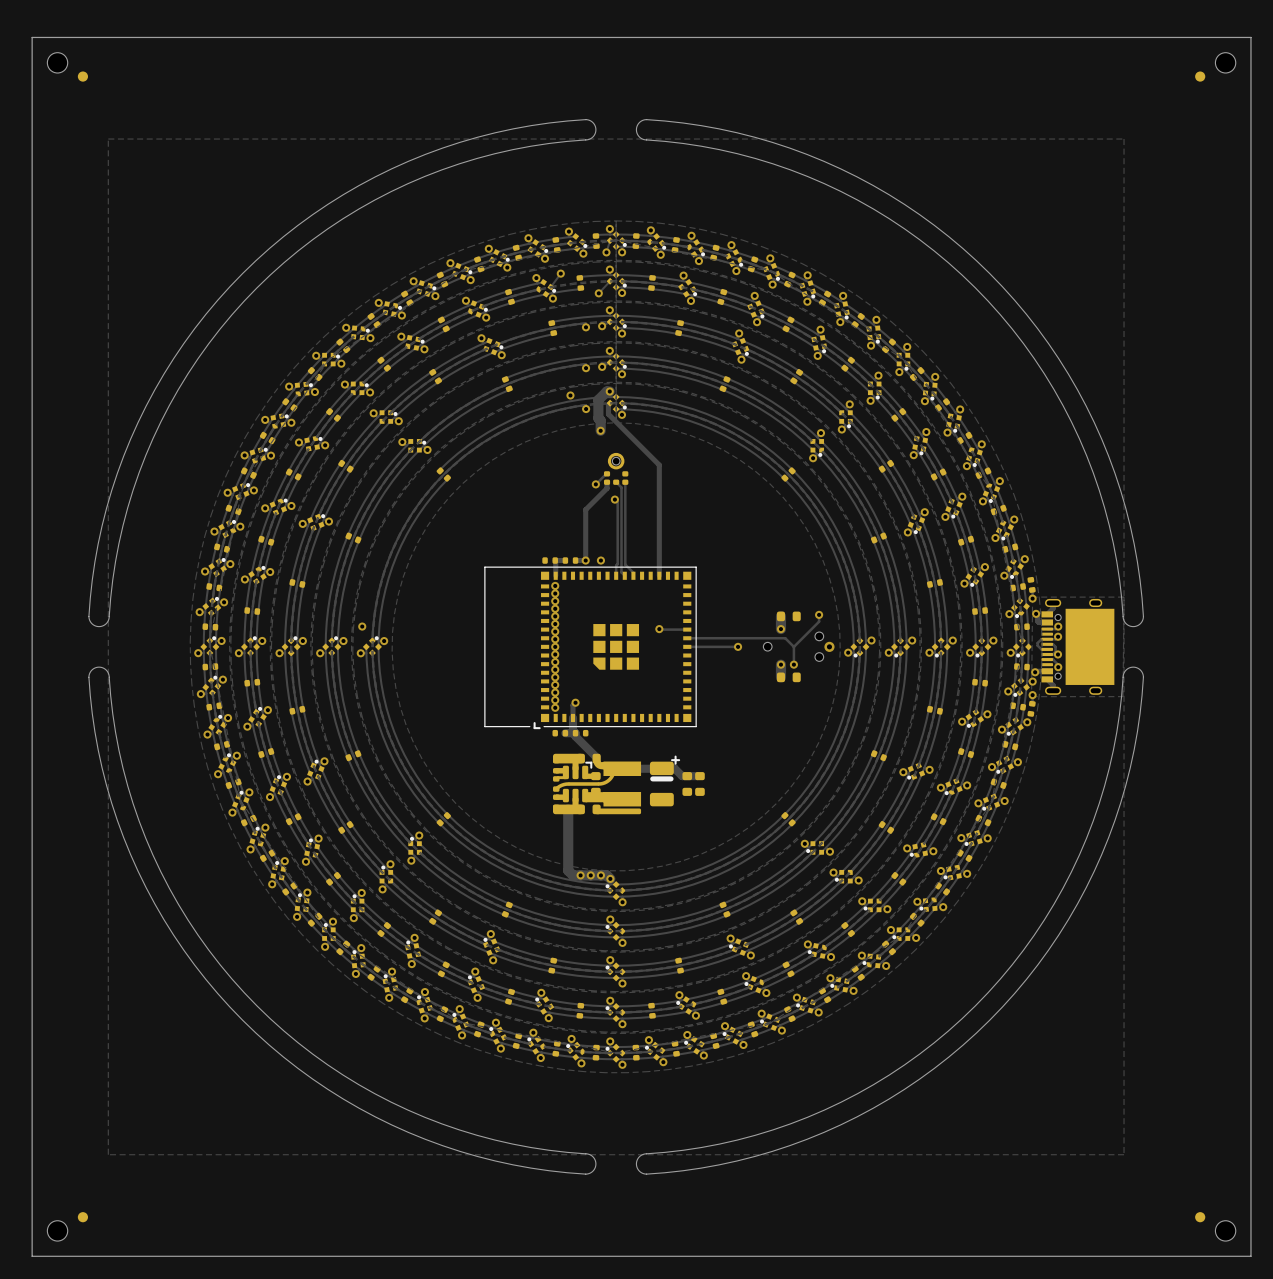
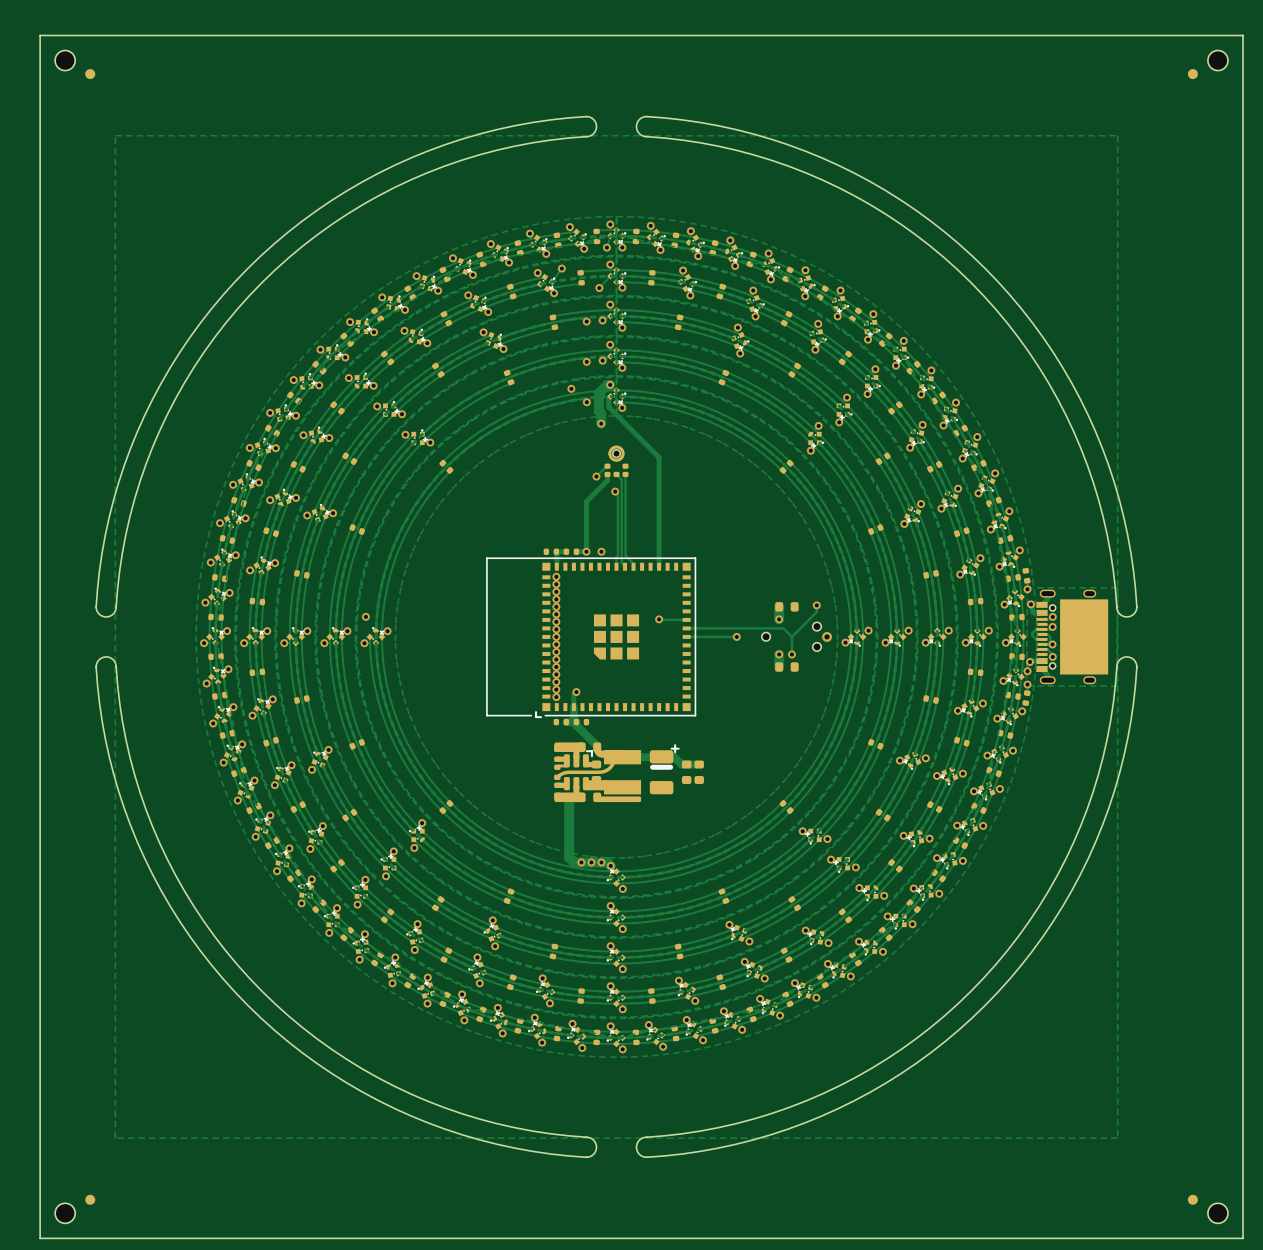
part footprint: [606, 231, 627, 250] -> [607, 226, 627, 246]
part footprint: [566, 233, 588, 252] -> [567, 228, 587, 248]
part footprint: [646, 233, 667, 252] -> [646, 228, 666, 248]
part footprint: [527, 239, 549, 258] -> [529, 234, 548, 253]
part footprint: [686, 239, 706, 258] -> [685, 234, 706, 253]
part footprint: [489, 249, 510, 268] -> [491, 244, 510, 263]
part footprint: [725, 249, 744, 268] -> [723, 244, 744, 263]
part footprint: [451, 262, 473, 281] -> [454, 257, 472, 276]
part footprint: [762, 262, 781, 281] -> [761, 257, 781, 277]
part footprint: [606, 271, 627, 291] -> [607, 266, 627, 286]
part footprint: [535, 279, 557, 298] -> [537, 273, 556, 293]
part footprint: [678, 279, 698, 298] -> [677, 273, 698, 293]
part footprint: [416, 280, 437, 297] -> [419, 275, 437, 292]
part footprint: [799, 280, 817, 299] -> [797, 275, 816, 294]
part footprint: [467, 300, 488, 318] -> [469, 294, 488, 313]
part footprint: [747, 300, 765, 319] -> [745, 294, 765, 314]
part footprint: [382, 301, 403, 317] -> [385, 295, 404, 312]
part footprint: [833, 301, 850, 320] -> [831, 295, 850, 314]
part footprint: [606, 312, 627, 332] -> [607, 306, 627, 326]
part footprint: [351, 325, 370, 341] -> [354, 318, 372, 335]
part footprint: [866, 325, 882, 344] -> [863, 319, 881, 337]
part footprint: [405, 334, 425, 351] -> [408, 328, 426, 345]
part footprint: [811, 334, 828, 354] -> [809, 329, 827, 347]
part footprint: [483, 337, 504, 356] -> [485, 331, 503, 350]
part footprint: [731, 337, 750, 356] -> [730, 331, 750, 351]
part footprint: [322, 352, 341, 367] -> [326, 344, 343, 361]
part footprint: [896, 352, 911, 371] -> [893, 346, 910, 364]
part footprint: [606, 353, 627, 372] -> [607, 347, 627, 366]
part footprint: [294, 381, 313, 397] -> [299, 372, 317, 390]
part footprint: [350, 381, 369, 396] -> [354, 372, 372, 389]
part footprint: [867, 381, 882, 400] -> [864, 375, 881, 392]
part footprint: [922, 381, 938, 401] -> [919, 375, 936, 393]
part footprint: [606, 393, 627, 413] -> [607, 387, 627, 406]
part footprint: [379, 410, 398, 424] -> [383, 400, 400, 417]
part footprint: [839, 410, 853, 429] -> [836, 403, 853, 420]
part footprint: [270, 413, 289, 430] -> [275, 404, 294, 423]
part footprint: [946, 413, 962, 433] -> [942, 406, 959, 424]
part footprint: [304, 435, 323, 452] -> [308, 426, 327, 445]
part footprint: [912, 435, 929, 456] -> [908, 428, 925, 446]
part footprint: [408, 439, 427, 453] -> [411, 429, 428, 446]
part footprint: [810, 439, 825, 457] -> [808, 431, 825, 449]
part footprint: [249, 447, 268, 464] -> [254, 437, 273, 457]
part footprint: [966, 447, 983, 468] -> [961, 439, 979, 457]
part footprint: [232, 482, 251, 501] -> [237, 473, 256, 493]
part footprint: [982, 482, 1001, 504] -> [978, 474, 996, 493]
part footprint: [269, 498, 288, 516] -> [274, 488, 293, 508]
part footprint: [945, 498, 963, 519] -> [941, 490, 959, 508]
part footprint: [307, 513, 326, 532] -> [311, 503, 330, 523]
part footprint: [907, 513, 926, 535] -> [904, 505, 922, 523]
part footprint: [218, 519, 237, 538] -> [223, 510, 243, 530]
part footprint: [995, 519, 1014, 541] -> [991, 511, 1010, 530]
part footprint: [208, 557, 227, 577] -> [214, 548, 233, 568]
part footprint: [1005, 558, 1024, 579] -> [1000, 549, 1019, 568]
part footprint: [248, 565, 267, 585] -> [253, 556, 272, 576]
part footprint: [965, 566, 985, 587] -> [961, 557, 980, 576]
part footprint: [202, 596, 222, 617] -> [208, 587, 227, 607]
part footprint: [1011, 597, 1030, 619] -> [1006, 588, 1025, 608]
part footprint: [200, 636, 220, 657] -> [206, 627, 225, 647]
part footprint: [241, 636, 260, 657] -> [246, 627, 265, 647]
part footprint: [281, 636, 301, 657] -> [286, 627, 305, 647]
part footprint: [322, 636, 342, 657] -> [326, 627, 346, 647]
part footprint: [363, 636, 382, 657] -> [366, 627, 386, 647]
part footprint: [850, 637, 870, 658] -> [847, 627, 867, 647]
part footprint: [891, 637, 910, 658] -> [887, 627, 907, 647]
part footprint: [931, 637, 951, 658] -> [928, 627, 947, 647]
part footprint: [972, 637, 992, 658] -> [968, 627, 987, 647]
part footprint: [1013, 637, 1032, 658] -> [1008, 627, 1027, 647]
part footprint: [202, 675, 222, 697] -> [208, 666, 227, 686]
part footprint: [1011, 677, 1030, 697] -> [1006, 667, 1025, 687]
part footprint: [248, 706, 267, 728] -> [253, 698, 272, 717]
part footprint: [965, 708, 985, 728] -> [961, 698, 980, 718]
part footprint: [208, 714, 227, 736] -> [214, 705, 233, 725]
part footprint: [1005, 716, 1024, 736] -> [1000, 706, 1019, 726]
part footprint: [218, 753, 237, 774] -> [223, 744, 242, 763]
part footprint: [995, 755, 1014, 774] -> [990, 744, 1010, 764]
part footprint: [307, 759, 325, 780] -> [311, 751, 329, 769]
part footprint: [907, 762, 926, 780] -> [903, 751, 922, 770]
part footprint: [269, 775, 288, 796] -> [274, 766, 292, 784]
part footprint: [944, 778, 963, 796] -> [940, 766, 959, 786]
part footprint: [232, 790, 250, 812] -> [237, 781, 255, 799]
part footprint: [982, 793, 1001, 812] -> [977, 781, 996, 801]
part footprint: [249, 826, 267, 847] -> [254, 816, 272, 835]
part footprint: [964, 830, 983, 847] -> [960, 817, 979, 837]
part footprint: [408, 836, 422, 855] -> [408, 825, 425, 843]
part footprint: [304, 838, 321, 858] -> [308, 828, 325, 846]
part footprint: [806, 841, 825, 855] -> [805, 828, 822, 845]
part footprint: [909, 842, 929, 858] -> [906, 829, 925, 848]
part footprint: [270, 861, 287, 881] -> [274, 850, 291, 868]
part footprint: [943, 864, 962, 881] -> [940, 851, 958, 870]
part footprint: [379, 865, 394, 884] -> [380, 853, 397, 871]
part footprint: [834, 869, 853, 884] -> [833, 857, 850, 874]
part footprint: [605, 881, 626, 900] -> [606, 868, 626, 887]
part footprint: [294, 893, 310, 912] -> [297, 881, 314, 899]
part footprint: [350, 894, 365, 913] -> [352, 882, 369, 899]
part footprint: [919, 897, 938, 912] -> [916, 884, 934, 901]
part footprint: [863, 898, 882, 913] -> [861, 885, 879, 902]
part footprint: [605, 921, 626, 941] -> [606, 908, 626, 927]
part footprint: [322, 922, 336, 941] -> [323, 910, 340, 928]
part footprint: [892, 927, 911, 941] -> [890, 913, 907, 930]
part footprint: [483, 937, 501, 956] -> [483, 923, 503, 942]
part footprint: [728, 938, 750, 956] -> [730, 924, 748, 942]
part footprint: [405, 940, 421, 959] -> [406, 927, 424, 945]
part footprint: [807, 943, 828, 959] -> [807, 929, 825, 946]
part footprint: [351, 950, 366, 969] -> [352, 936, 370, 955]
part footprint: [862, 953, 882, 969] -> [861, 939, 879, 956]
part footprint: [605, 962, 626, 982] -> [606, 948, 626, 967]
part footprint: [382, 974, 399, 993] -> [383, 960, 402, 979]
part footprint: [467, 975, 485, 994] -> [468, 960, 488, 979]
part footprint: [744, 975, 765, 994] -> [745, 961, 764, 979]
part footprint: [830, 976, 850, 993] -> [829, 962, 848, 979]
part footprint: [416, 995, 434, 1014] -> [417, 980, 436, 999]
part footprint: [535, 996, 555, 1015] -> [535, 981, 556, 1000]
part footprint: [676, 996, 697, 1015] -> [677, 981, 697, 1000]
part footprint: [796, 996, 817, 1014] -> [796, 982, 814, 999]
part footprint: [605, 1003, 626, 1022] -> [606, 988, 626, 1008]
part footprint: [451, 1012, 470, 1031] -> [452, 997, 472, 1016]
part footprint: [760, 1013, 781, 1031] -> [761, 998, 779, 1016]
part footprint: [489, 1026, 508, 1045] -> [489, 1011, 510, 1030]
part footprint: [722, 1026, 744, 1045] -> [724, 1011, 742, 1030]
part footprint: [527, 1036, 547, 1055] -> [528, 1021, 548, 1040]
part footprint: [684, 1036, 705, 1055] -> [685, 1021, 704, 1040]
part footprint: [566, 1041, 586, 1061] -> [567, 1026, 587, 1046]
part footprint: [644, 1041, 666, 1061] -> [646, 1026, 666, 1046]
part footprint: [605, 1043, 626, 1063] -> [606, 1028, 626, 1048]

